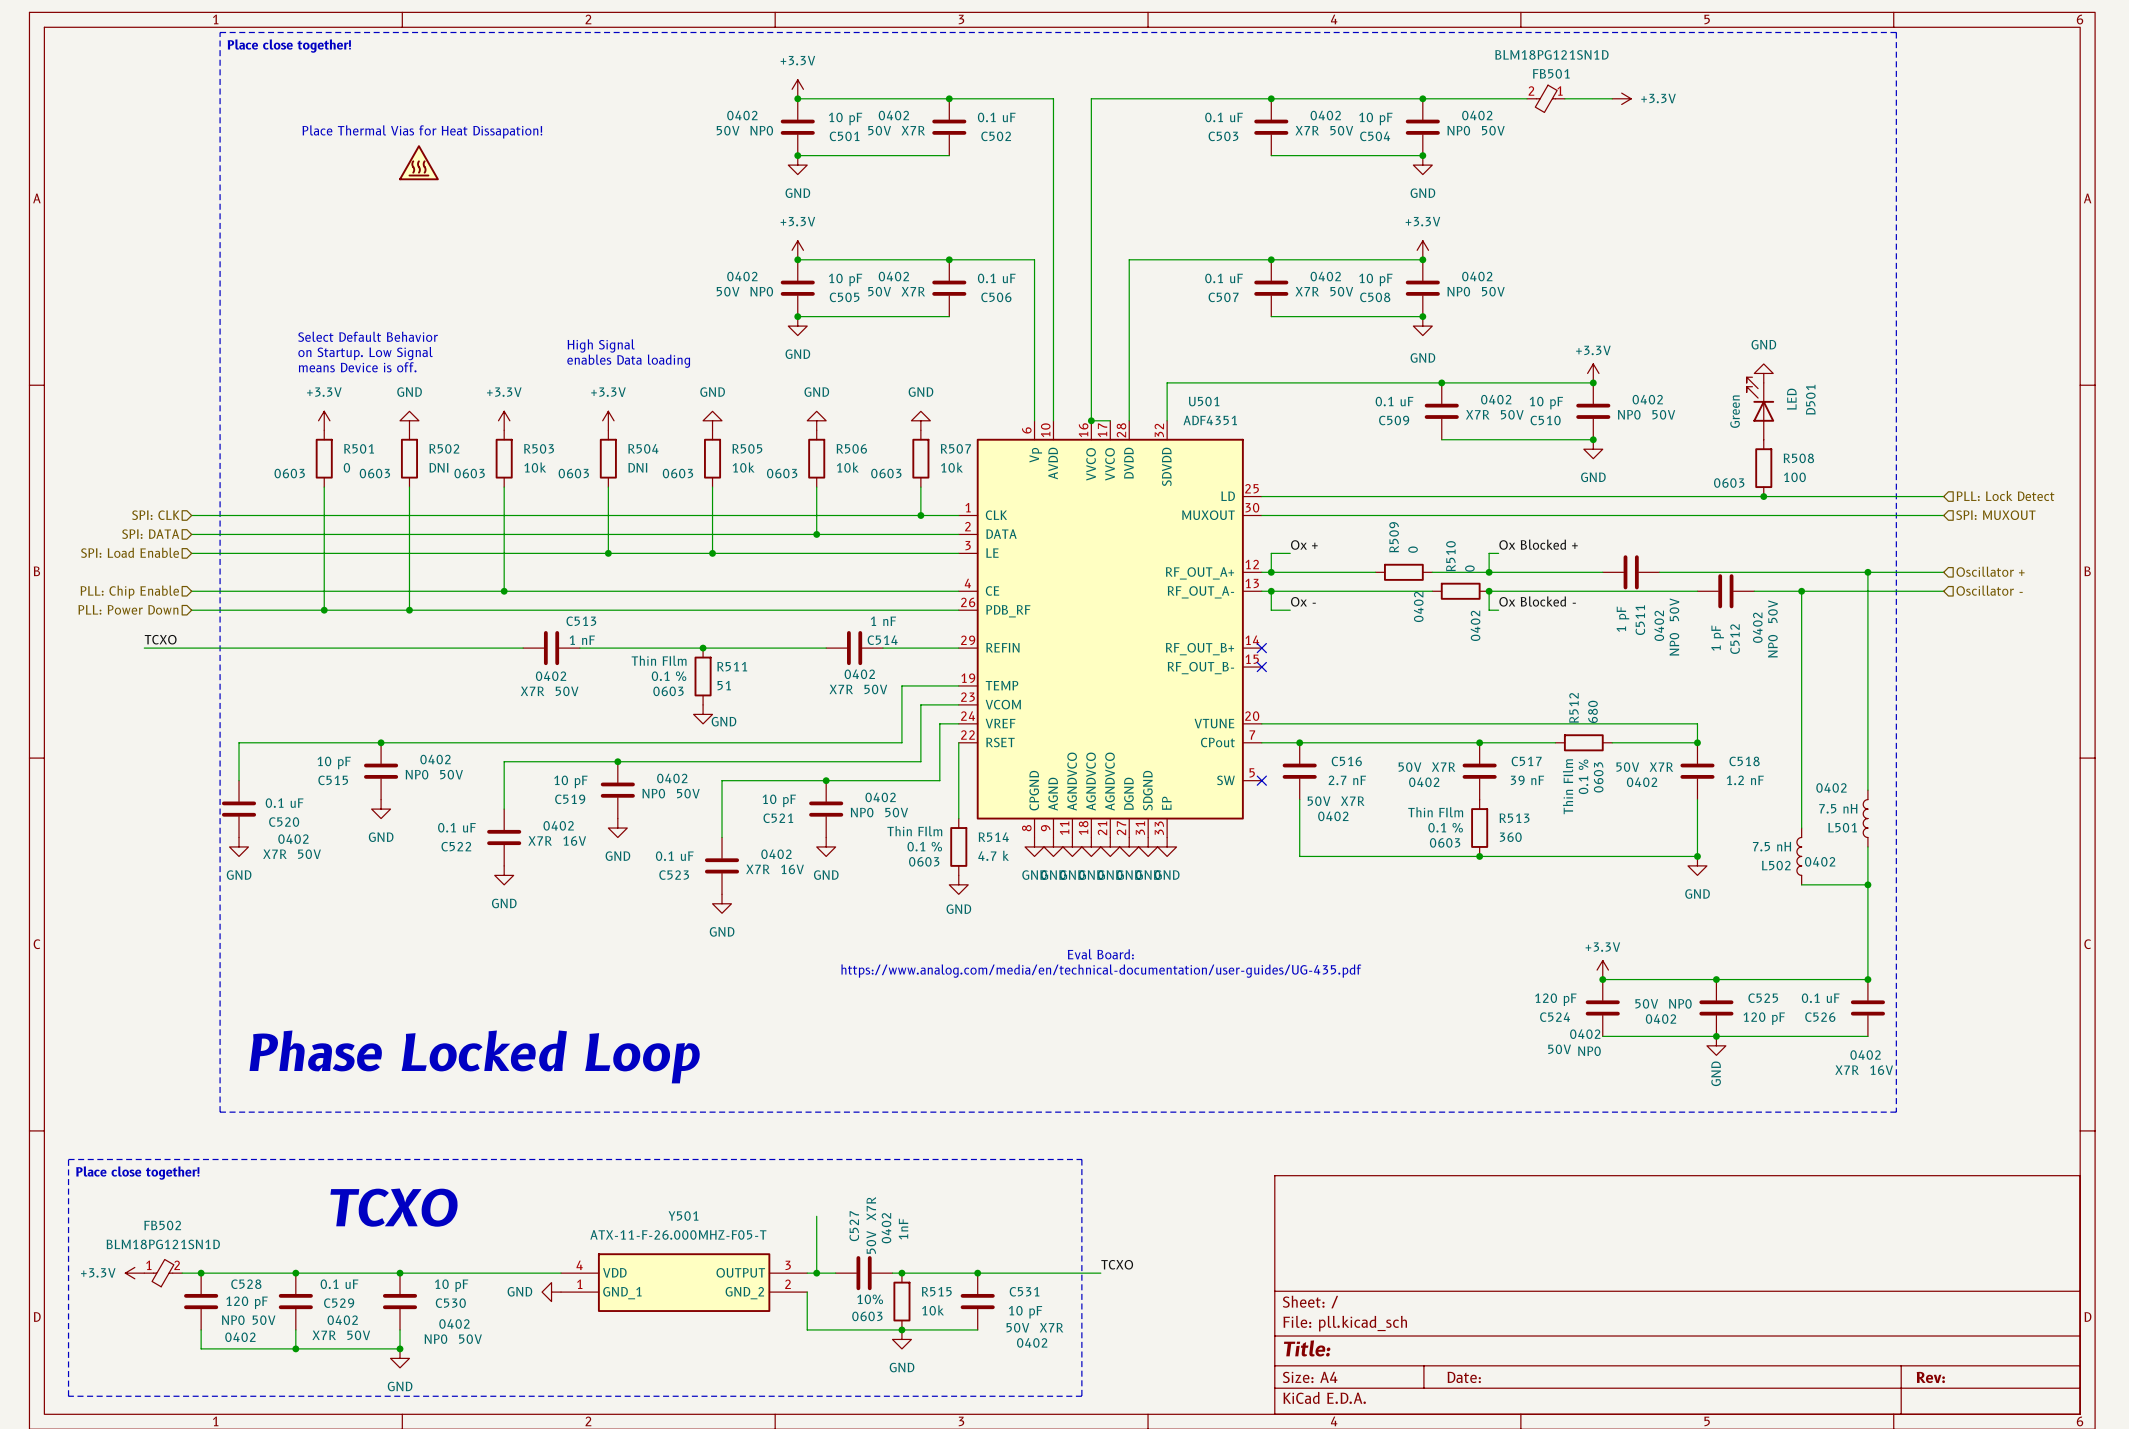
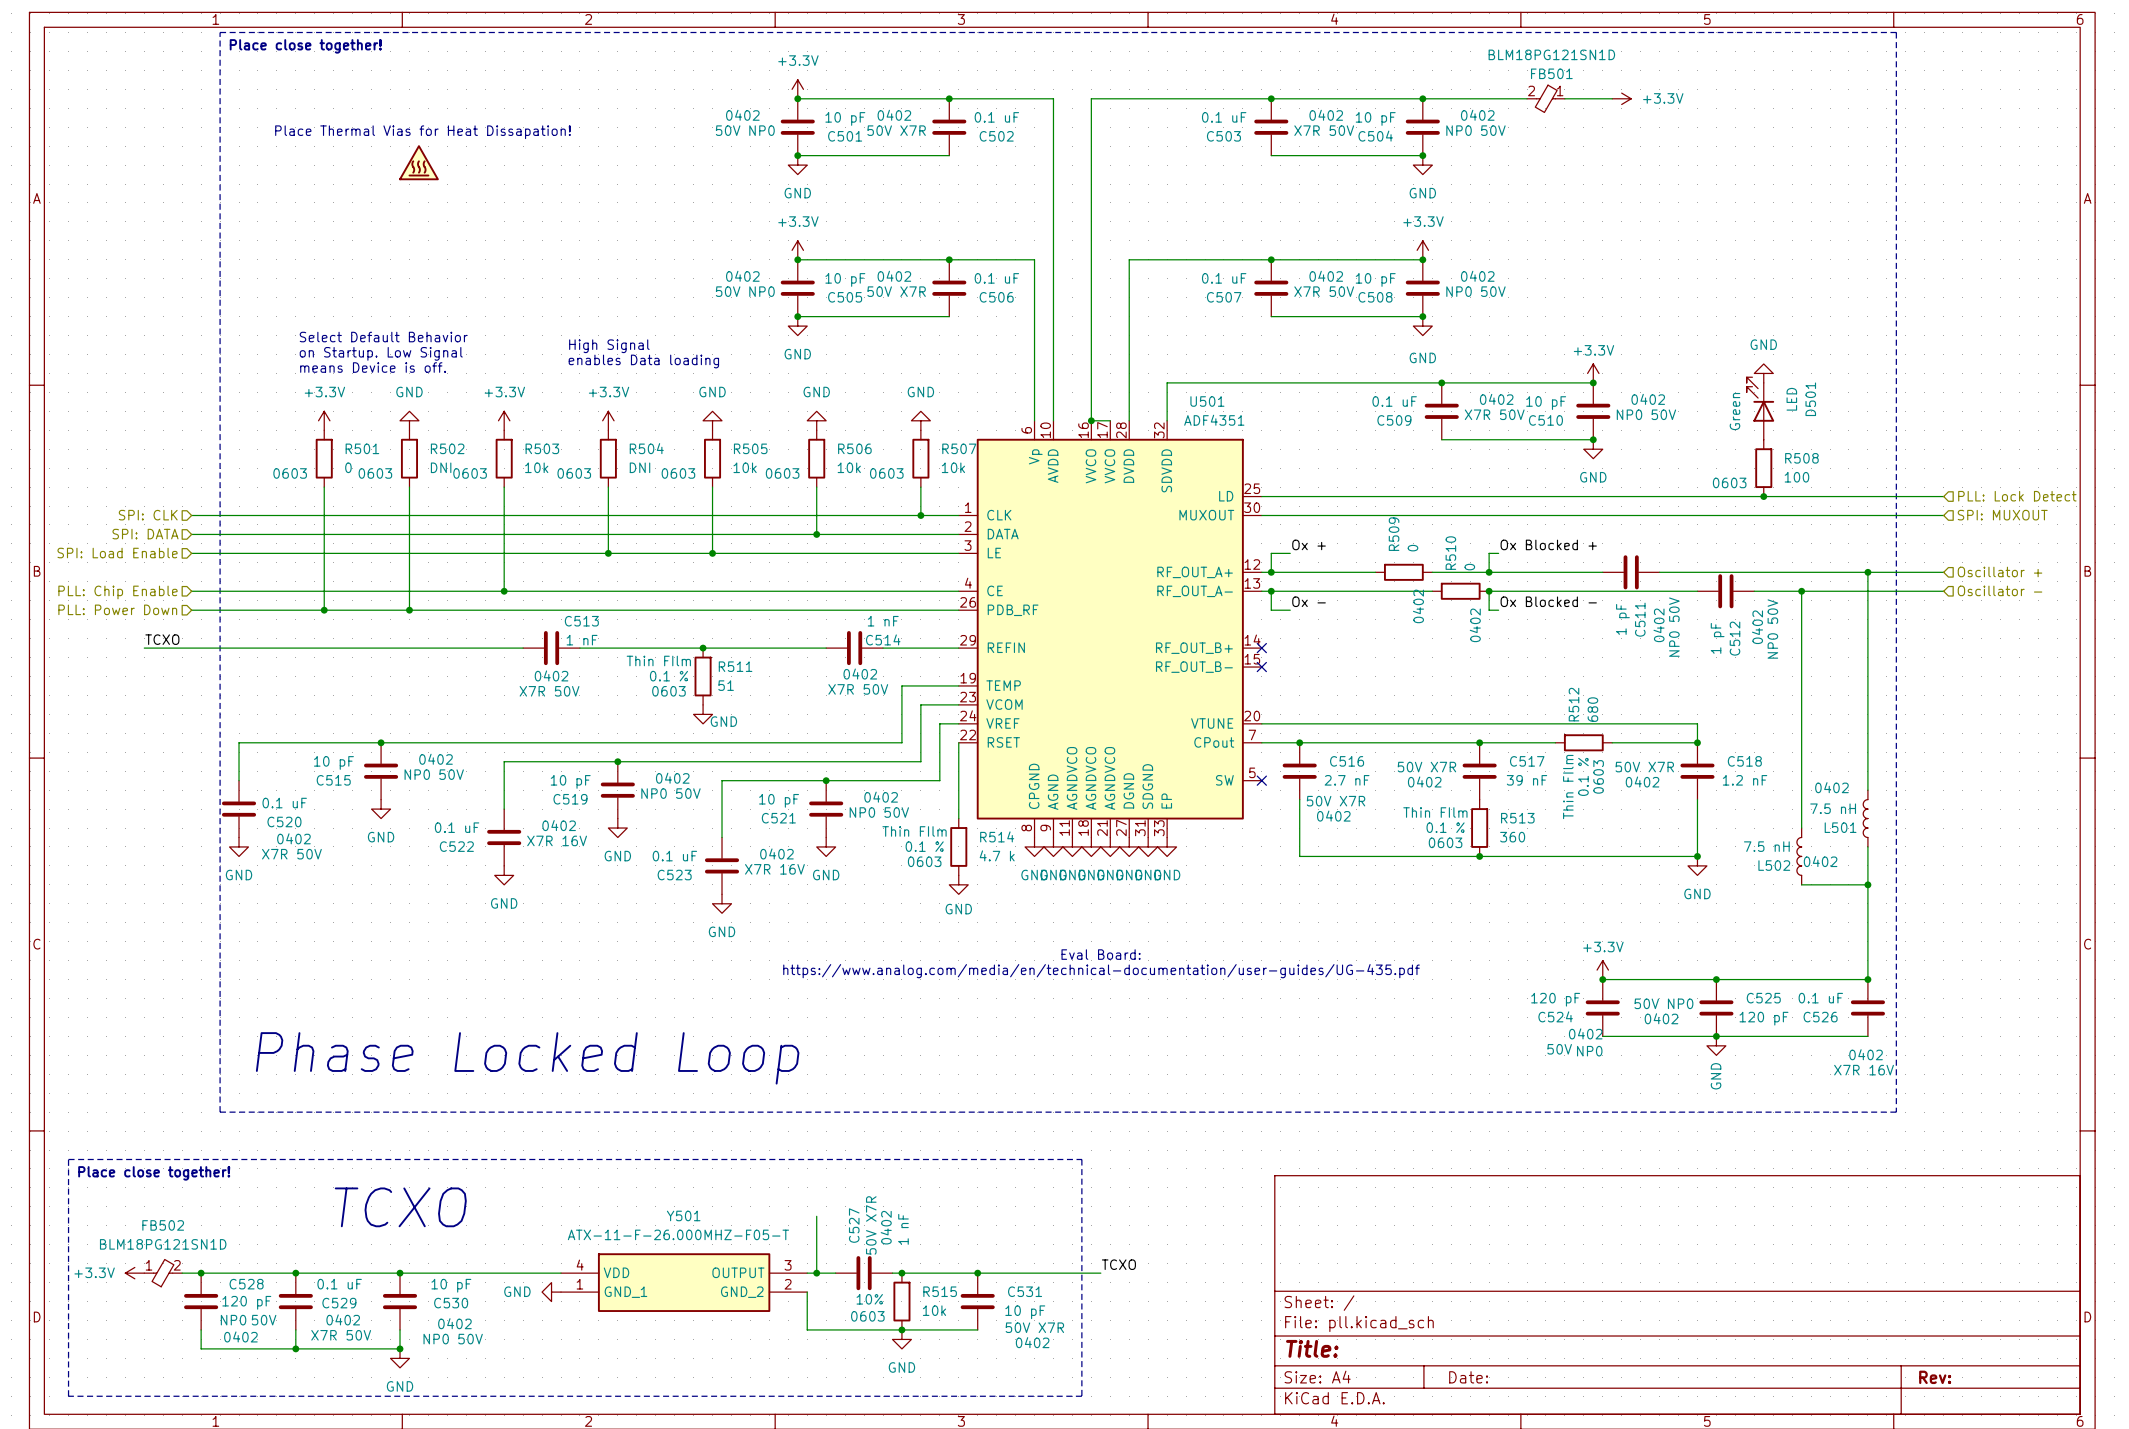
C527 value: 1nF (903, 1229) -> 1 nF (903, 1229)

